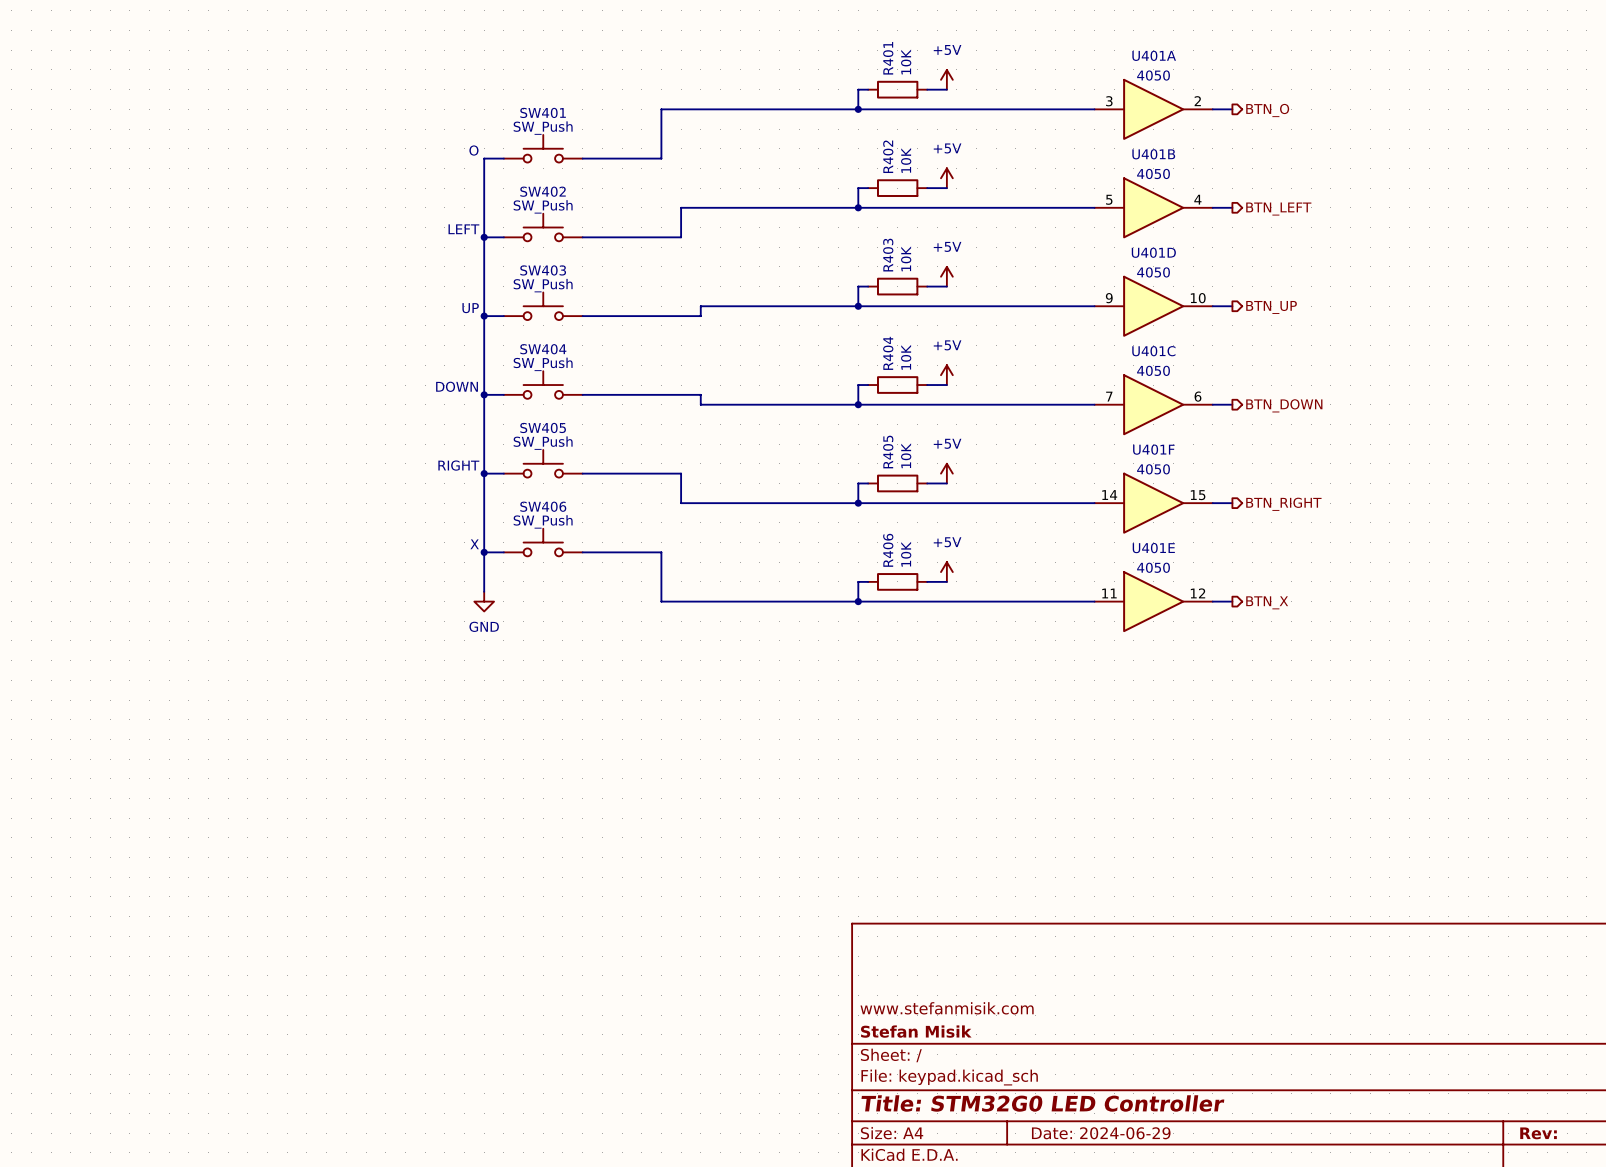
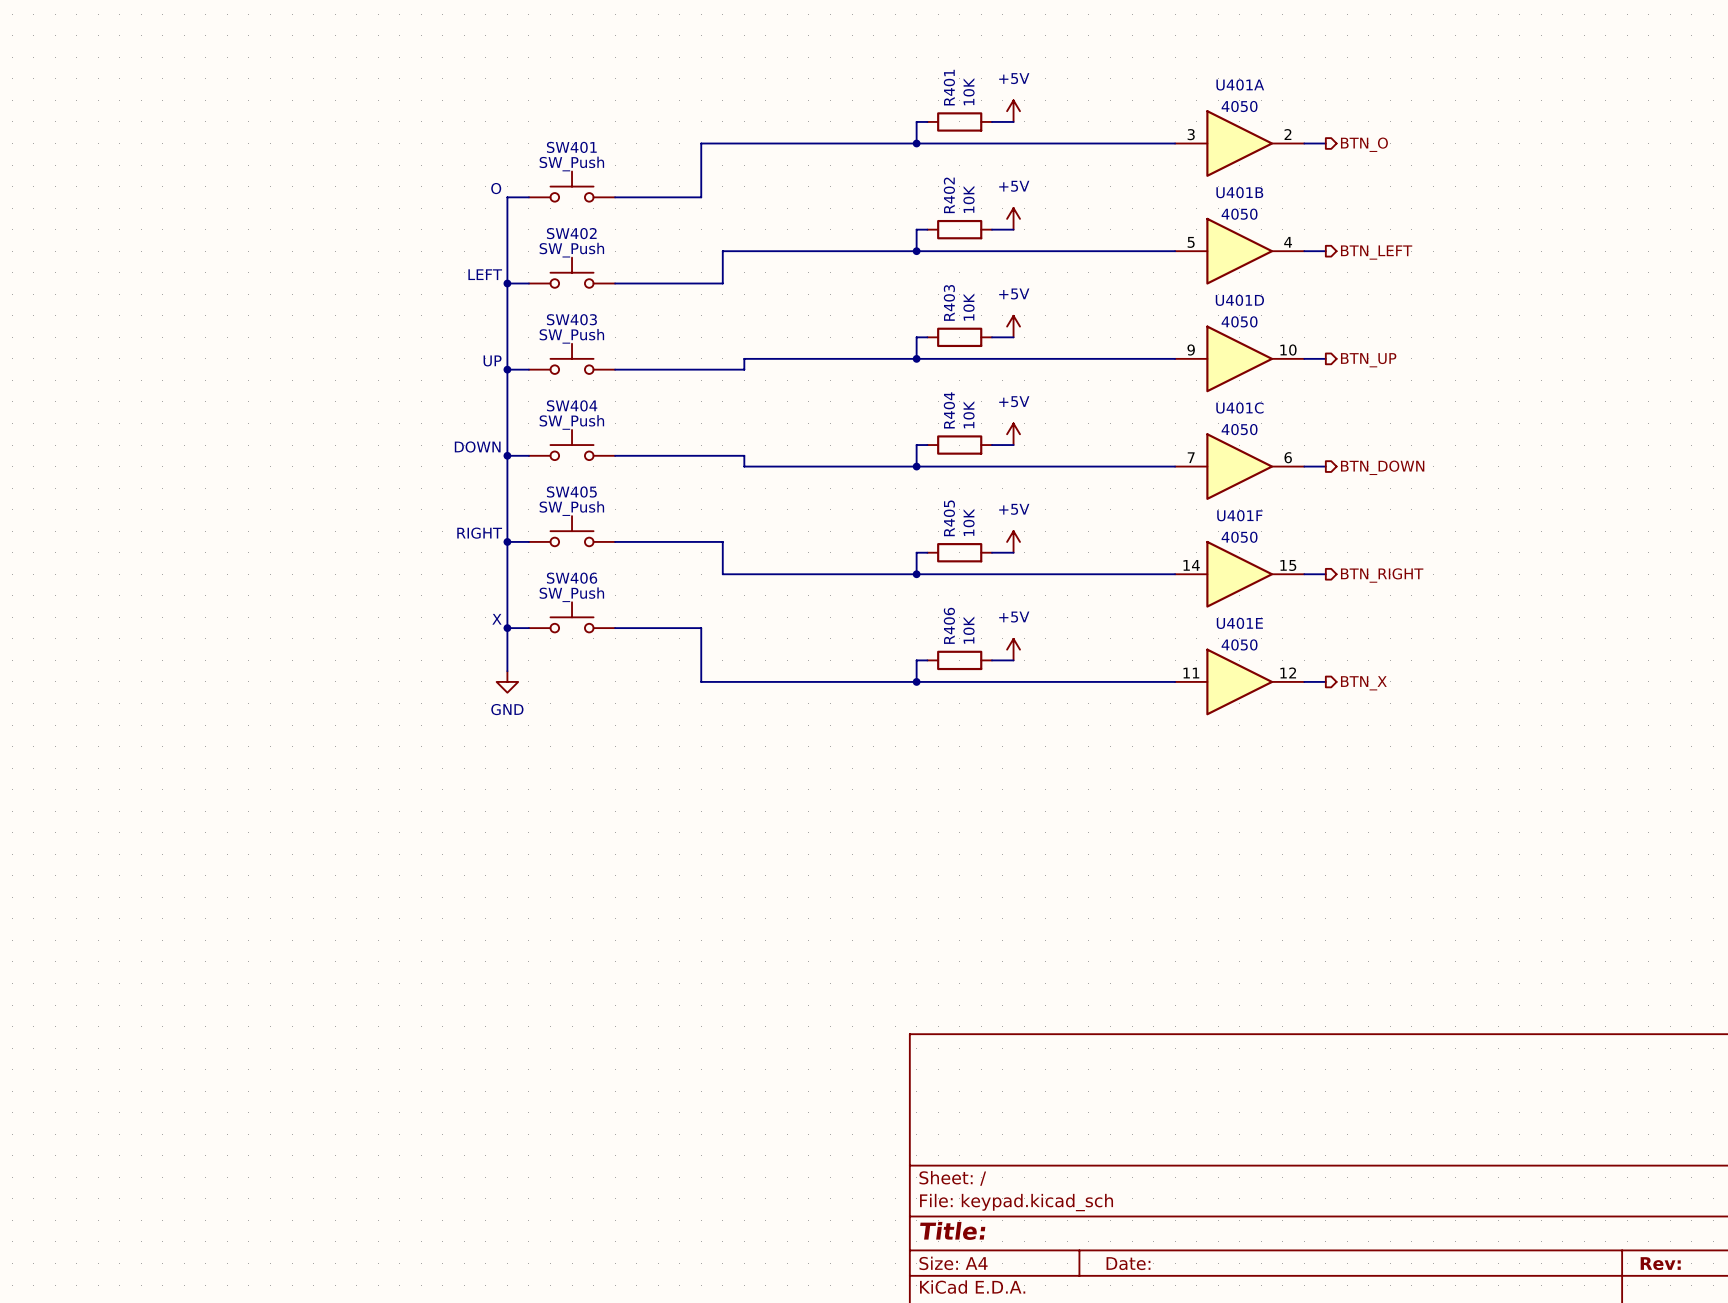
title block: www.stefanmisik.com (947, 1008) -> none
title block: Stefan Misik (916, 1031) -> none
title block: Title: STM32G0 LED Controller (1042, 1103) -> Title: (952, 1230)
title block: Date: 2024-06-29 (1101, 1133) -> Date: (1128, 1263)

